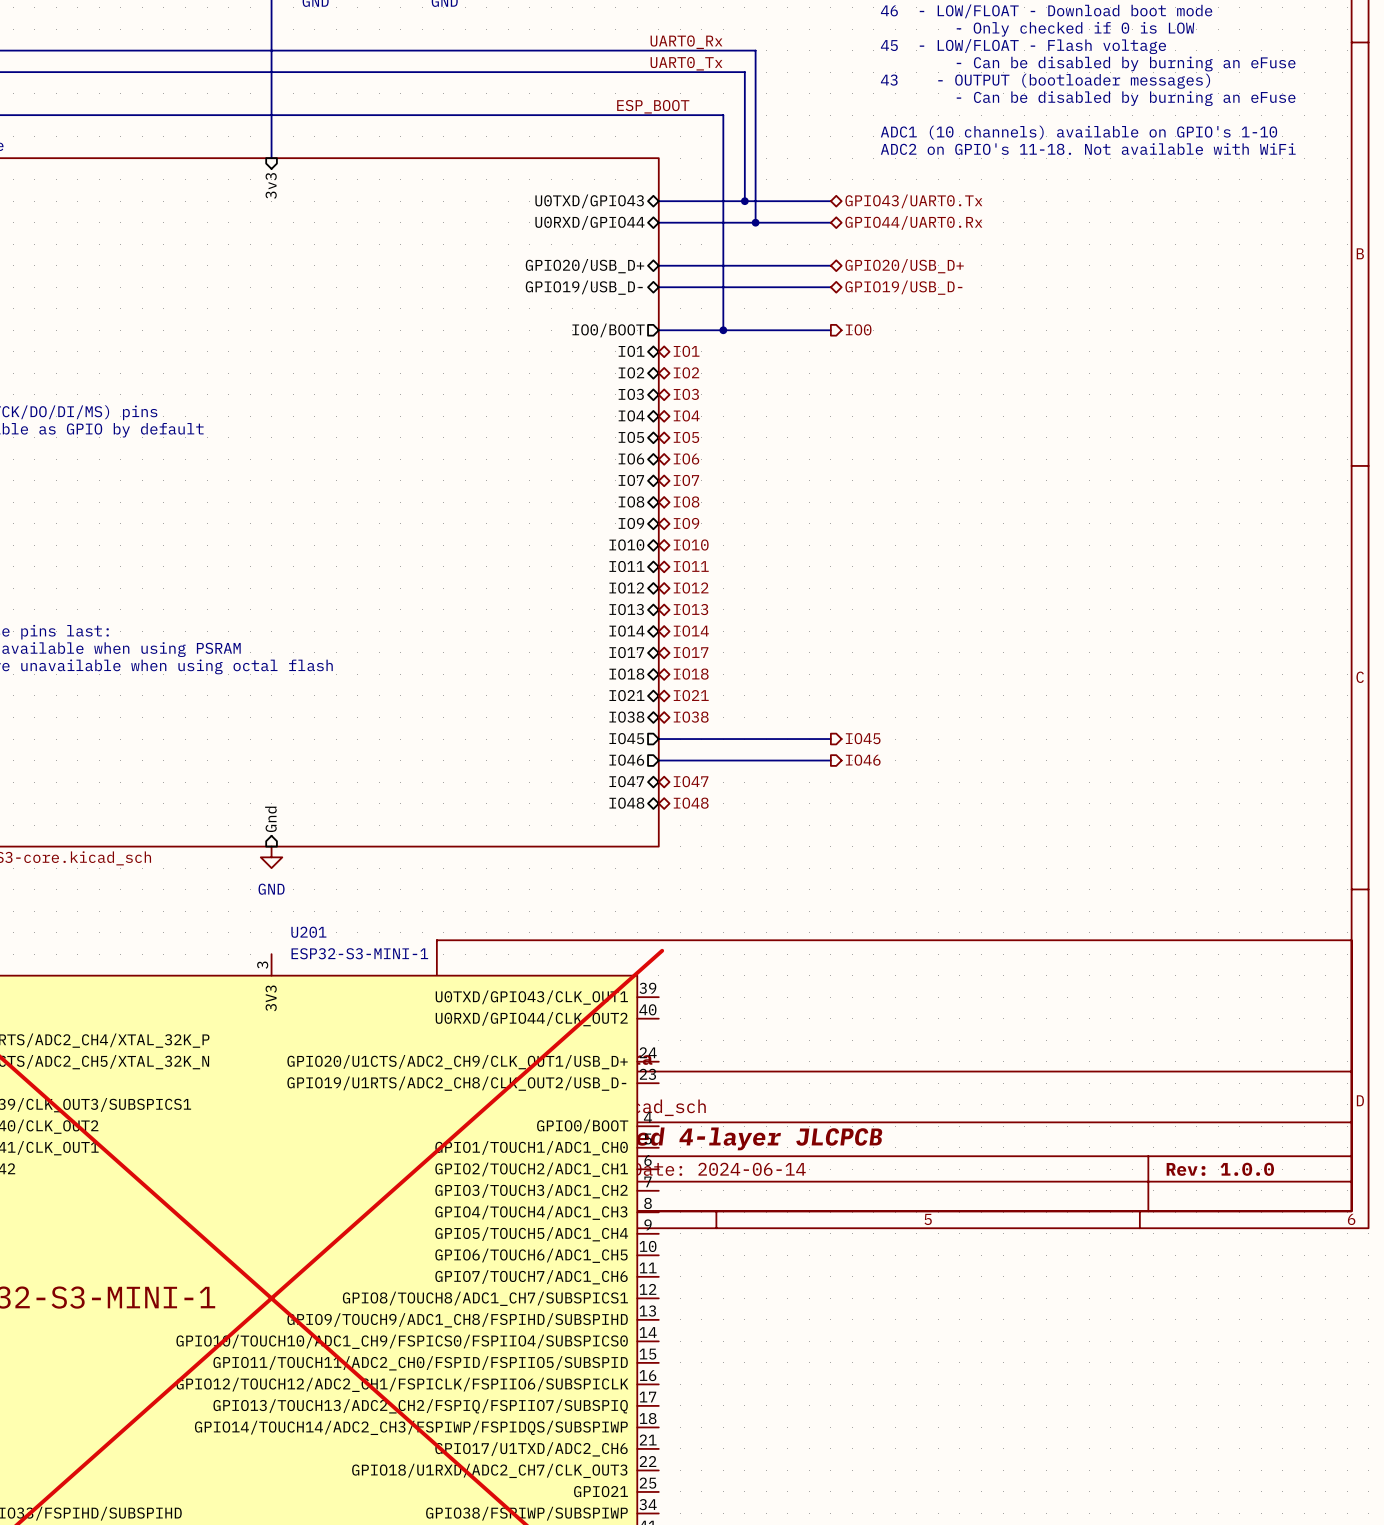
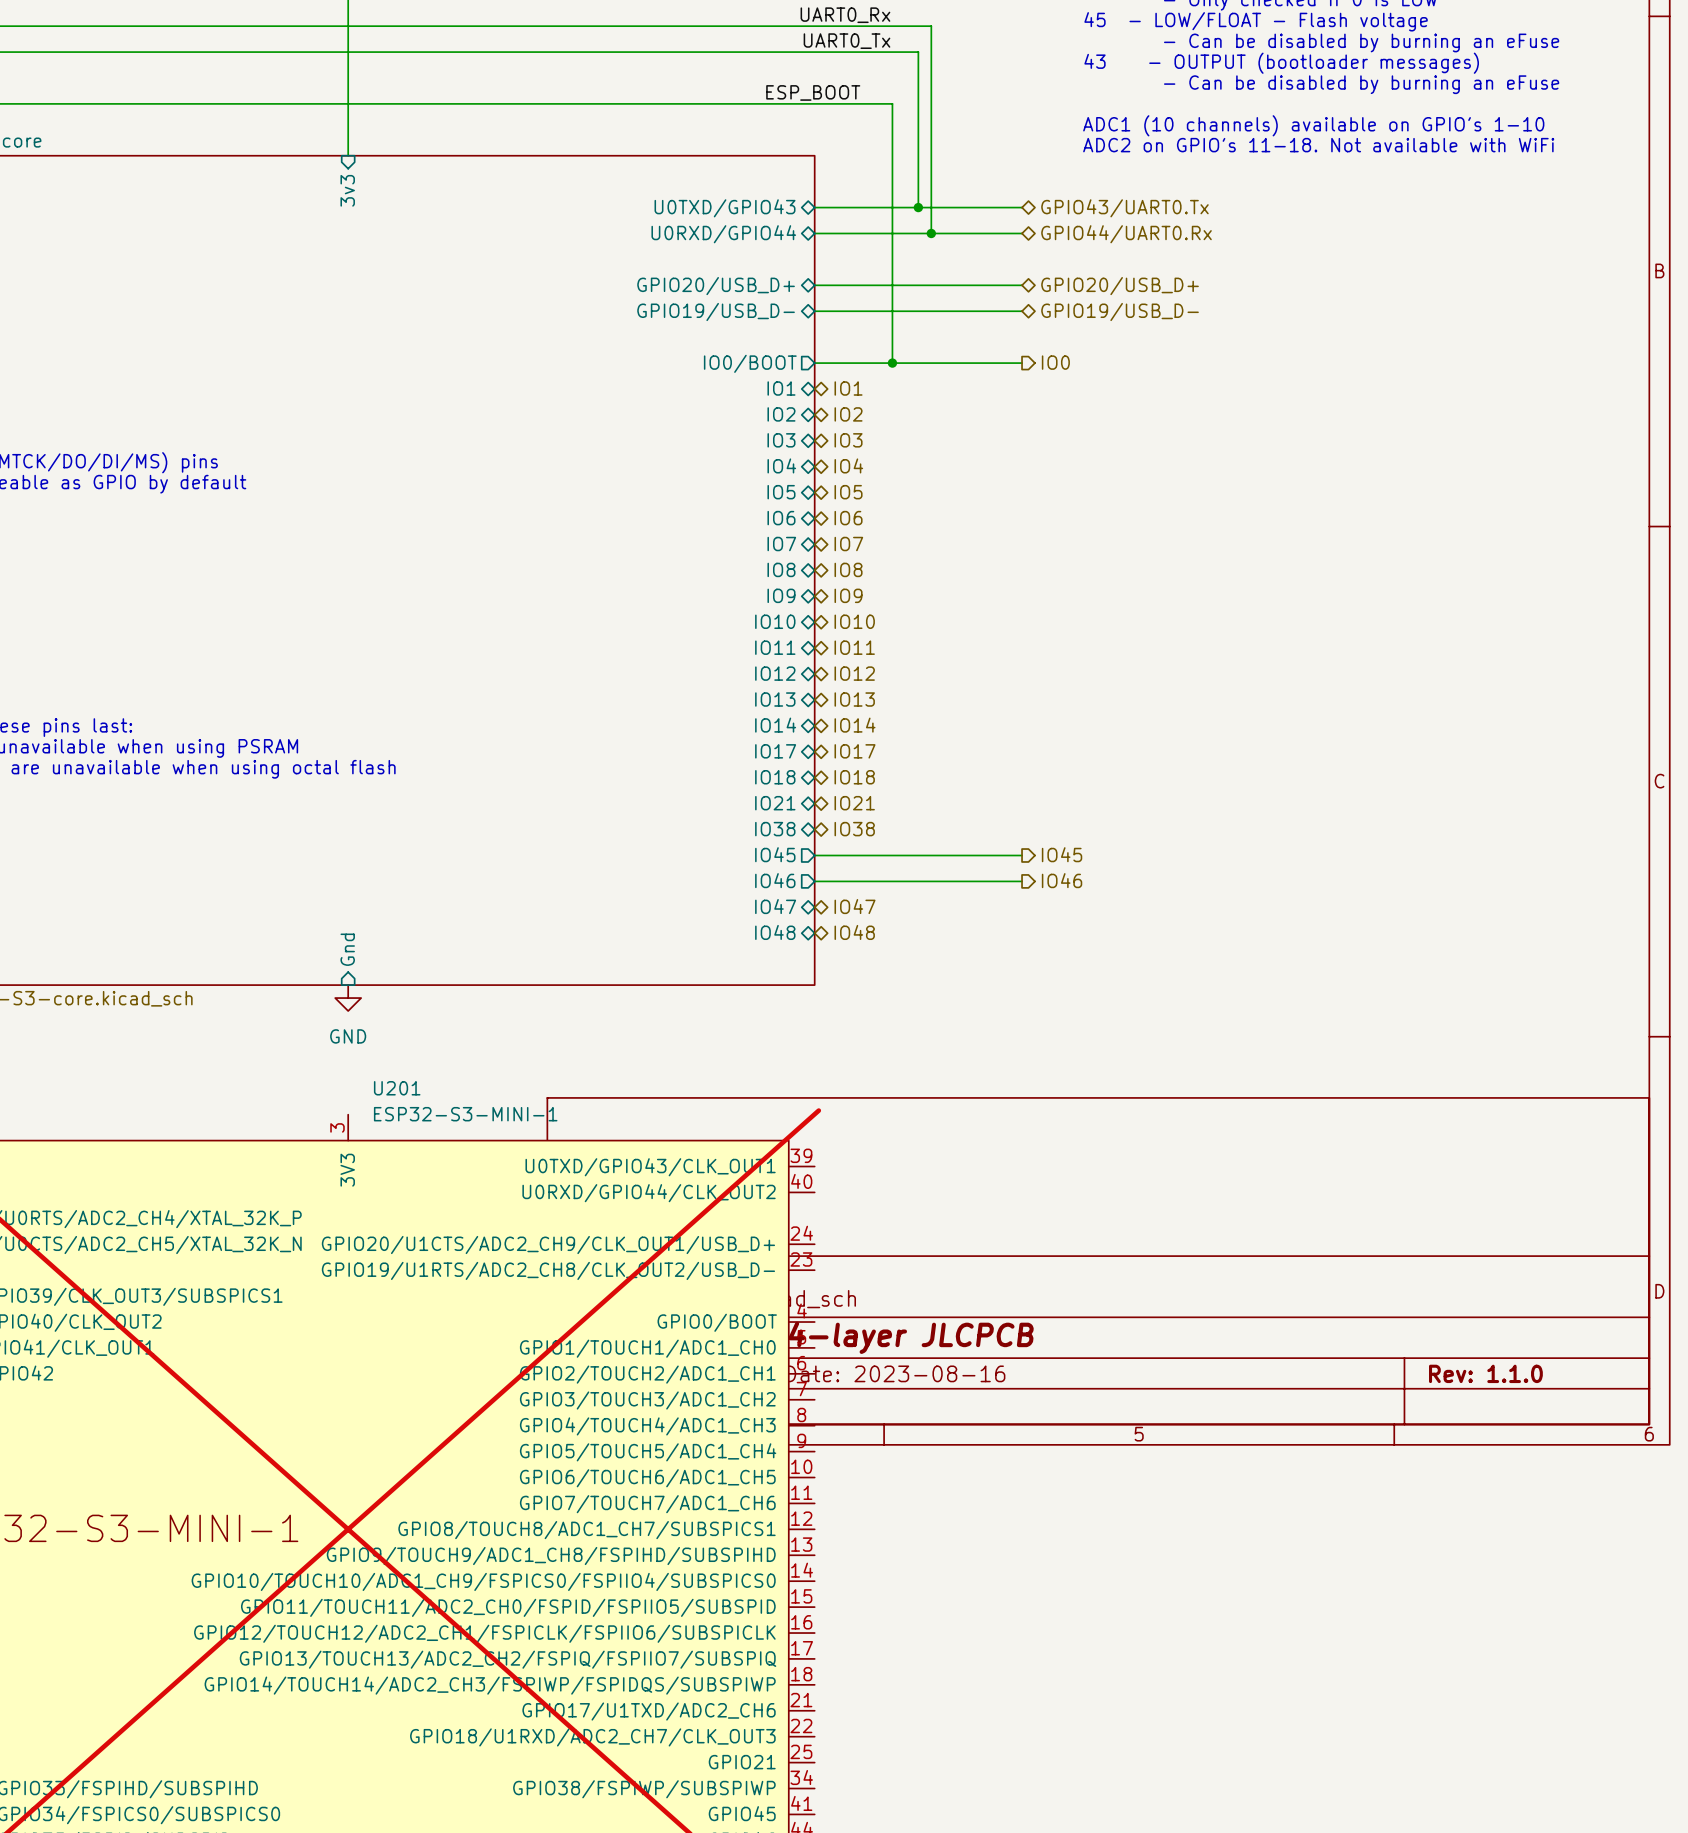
title block: Date: 2024-06-14 (719, 1169) -> Date: 2023-08-16 (895, 1373)
title block: Rev: 1.0.0 (1220, 1169) -> Rev: 1.1.0 (1485, 1373)

